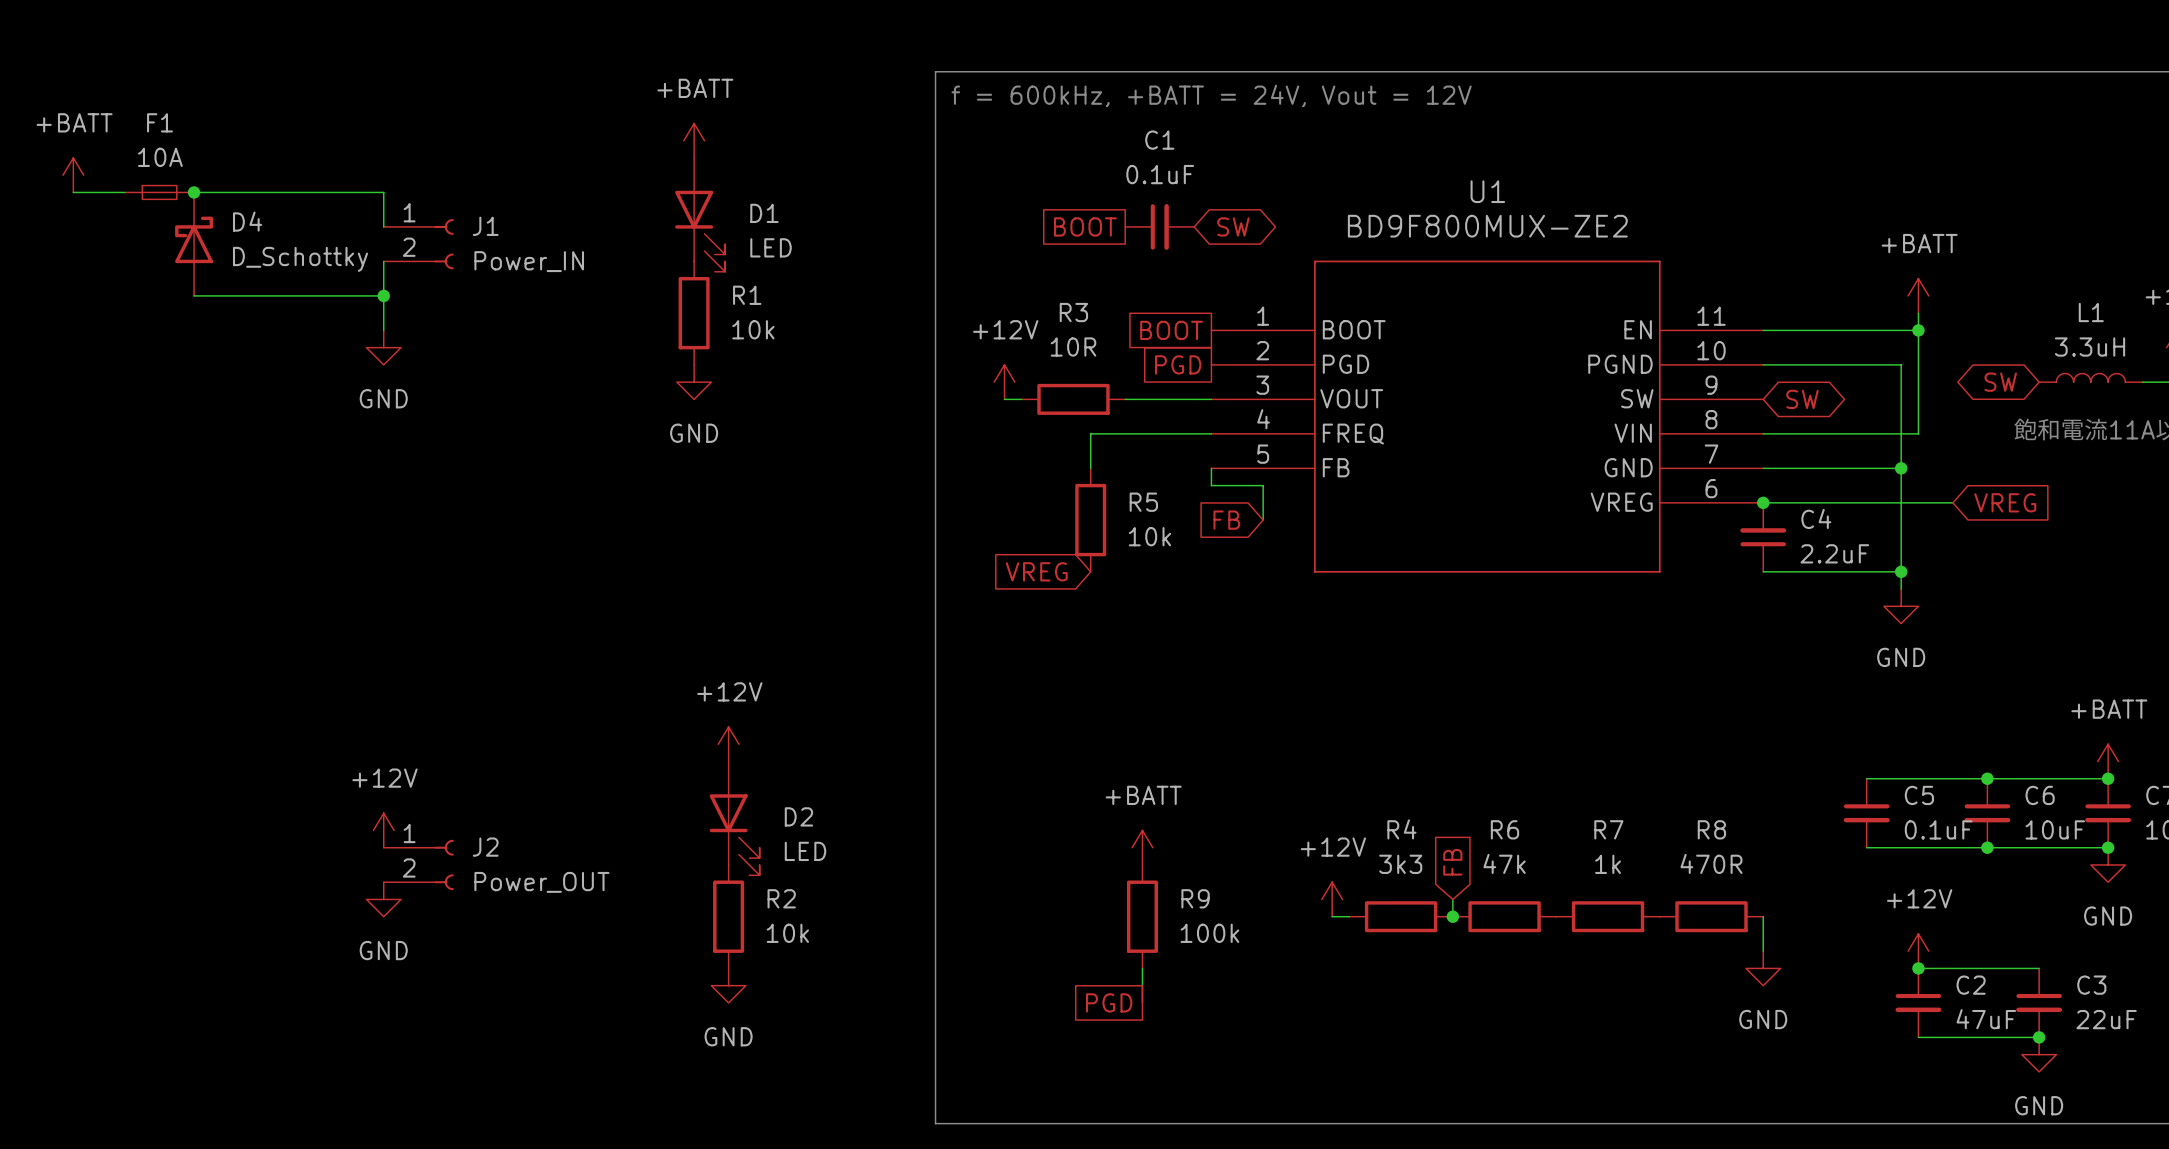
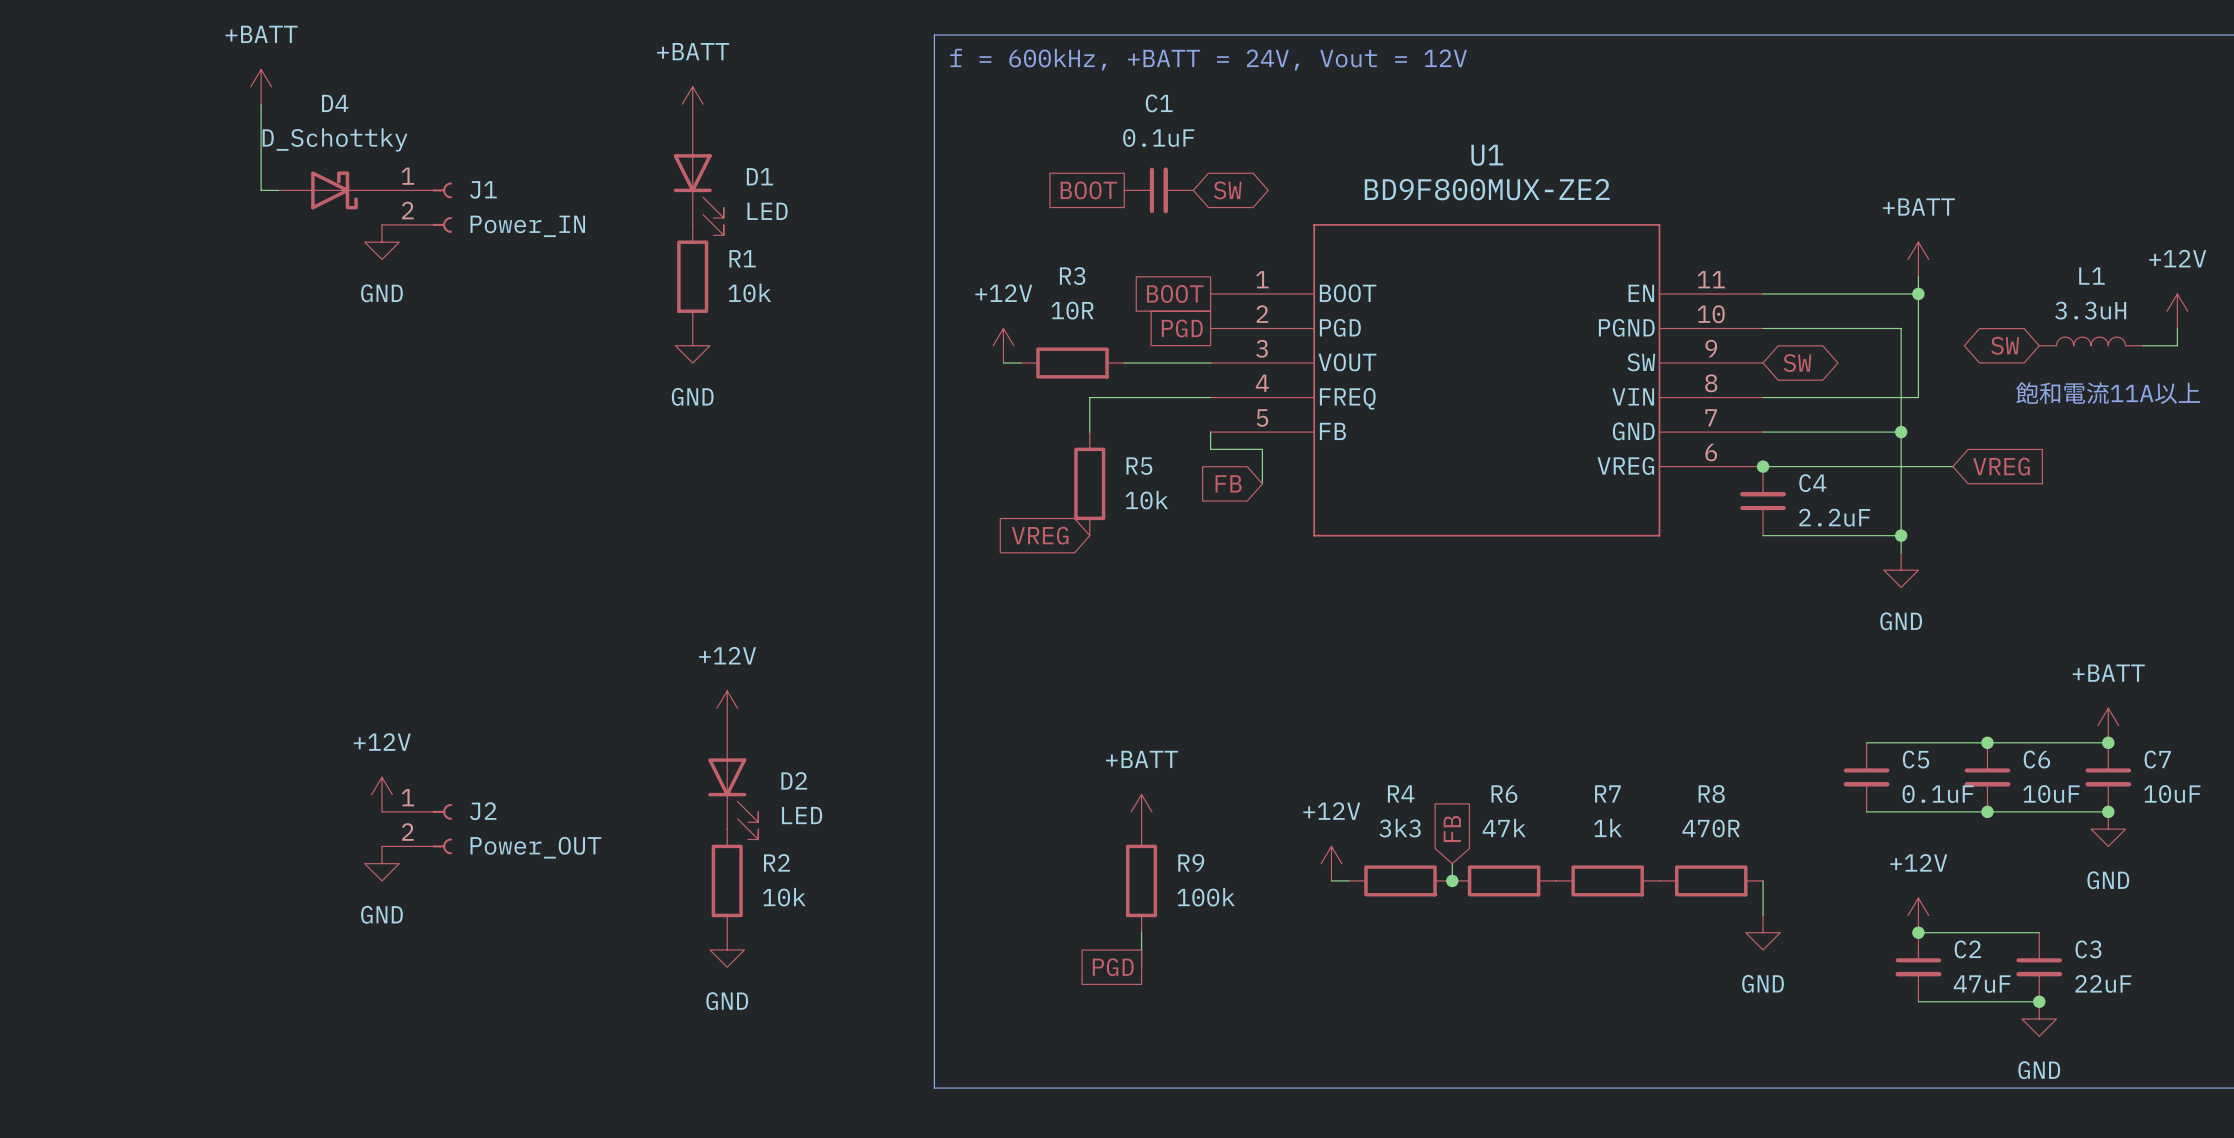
wire: none -> (261, 104) (261, 190) (278, 190)
power symbol position: +BATT (73, 175) -> +BATT (261, 86)
wire: (73, 192) (125, 192) -> none
F1: 10A (159, 192) -> none
wire: (194, 192) (383, 192) (383, 226) -> none
junction: (194, 192) -> none
D4 name position: D4 (247, 221) -> D4 (335, 103)
D4 rotation: 0° (194, 239) -> 90° clockwise (334, 190)
D4 position: (194, 244) -> (330, 190)
D4 value position: D_Schottky (300, 259) -> D_Schottky (335, 139)
wire: (383, 261) (383, 330) -> none
wire: (194, 295) (383, 295) -> none
junction: (383, 295) -> none
power symbol position: GND (383, 347) -> GND (381, 242)

